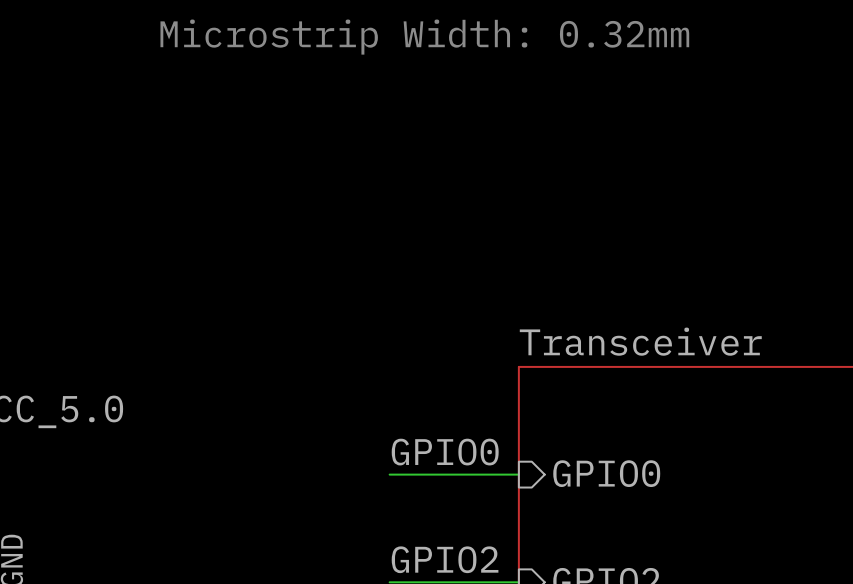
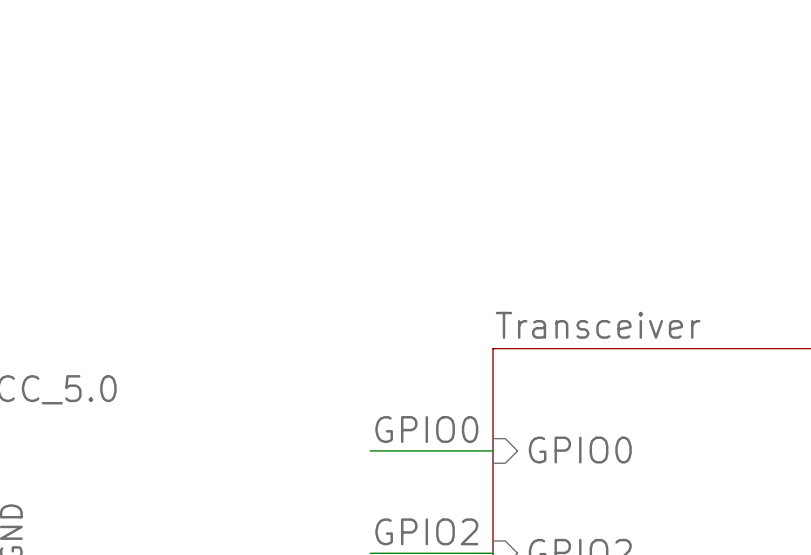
text: Microstrip Width: 0.32mm (424, 37) -> none

